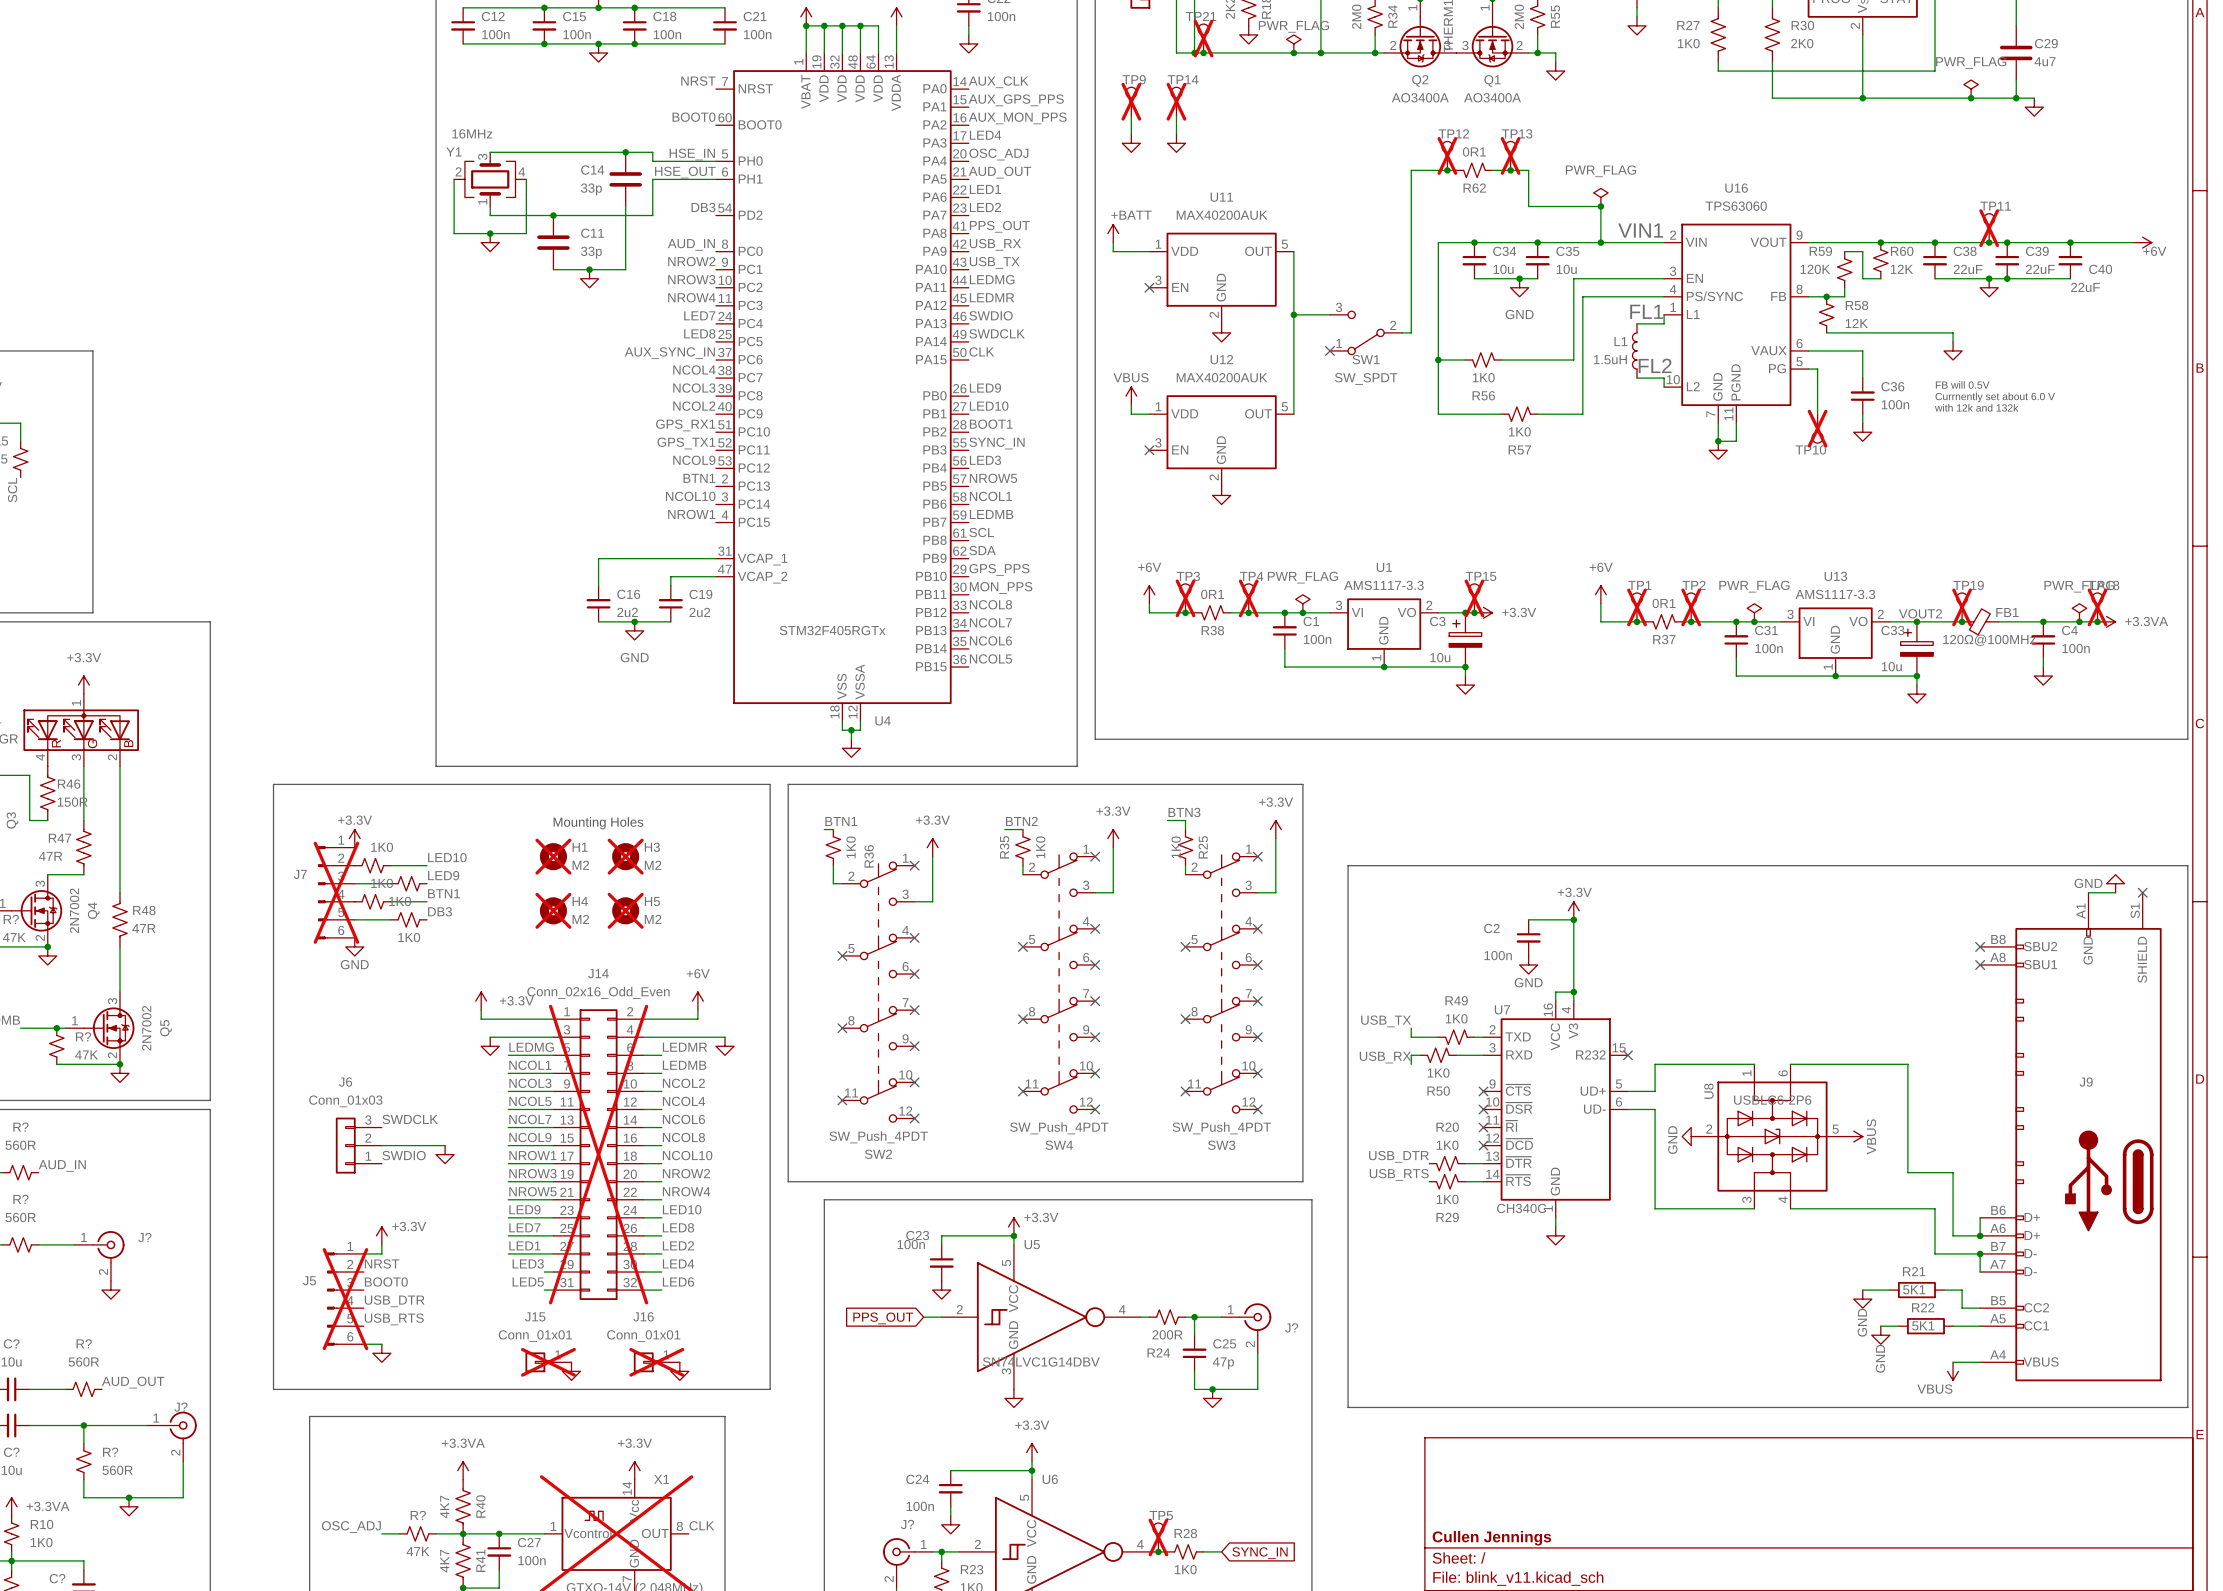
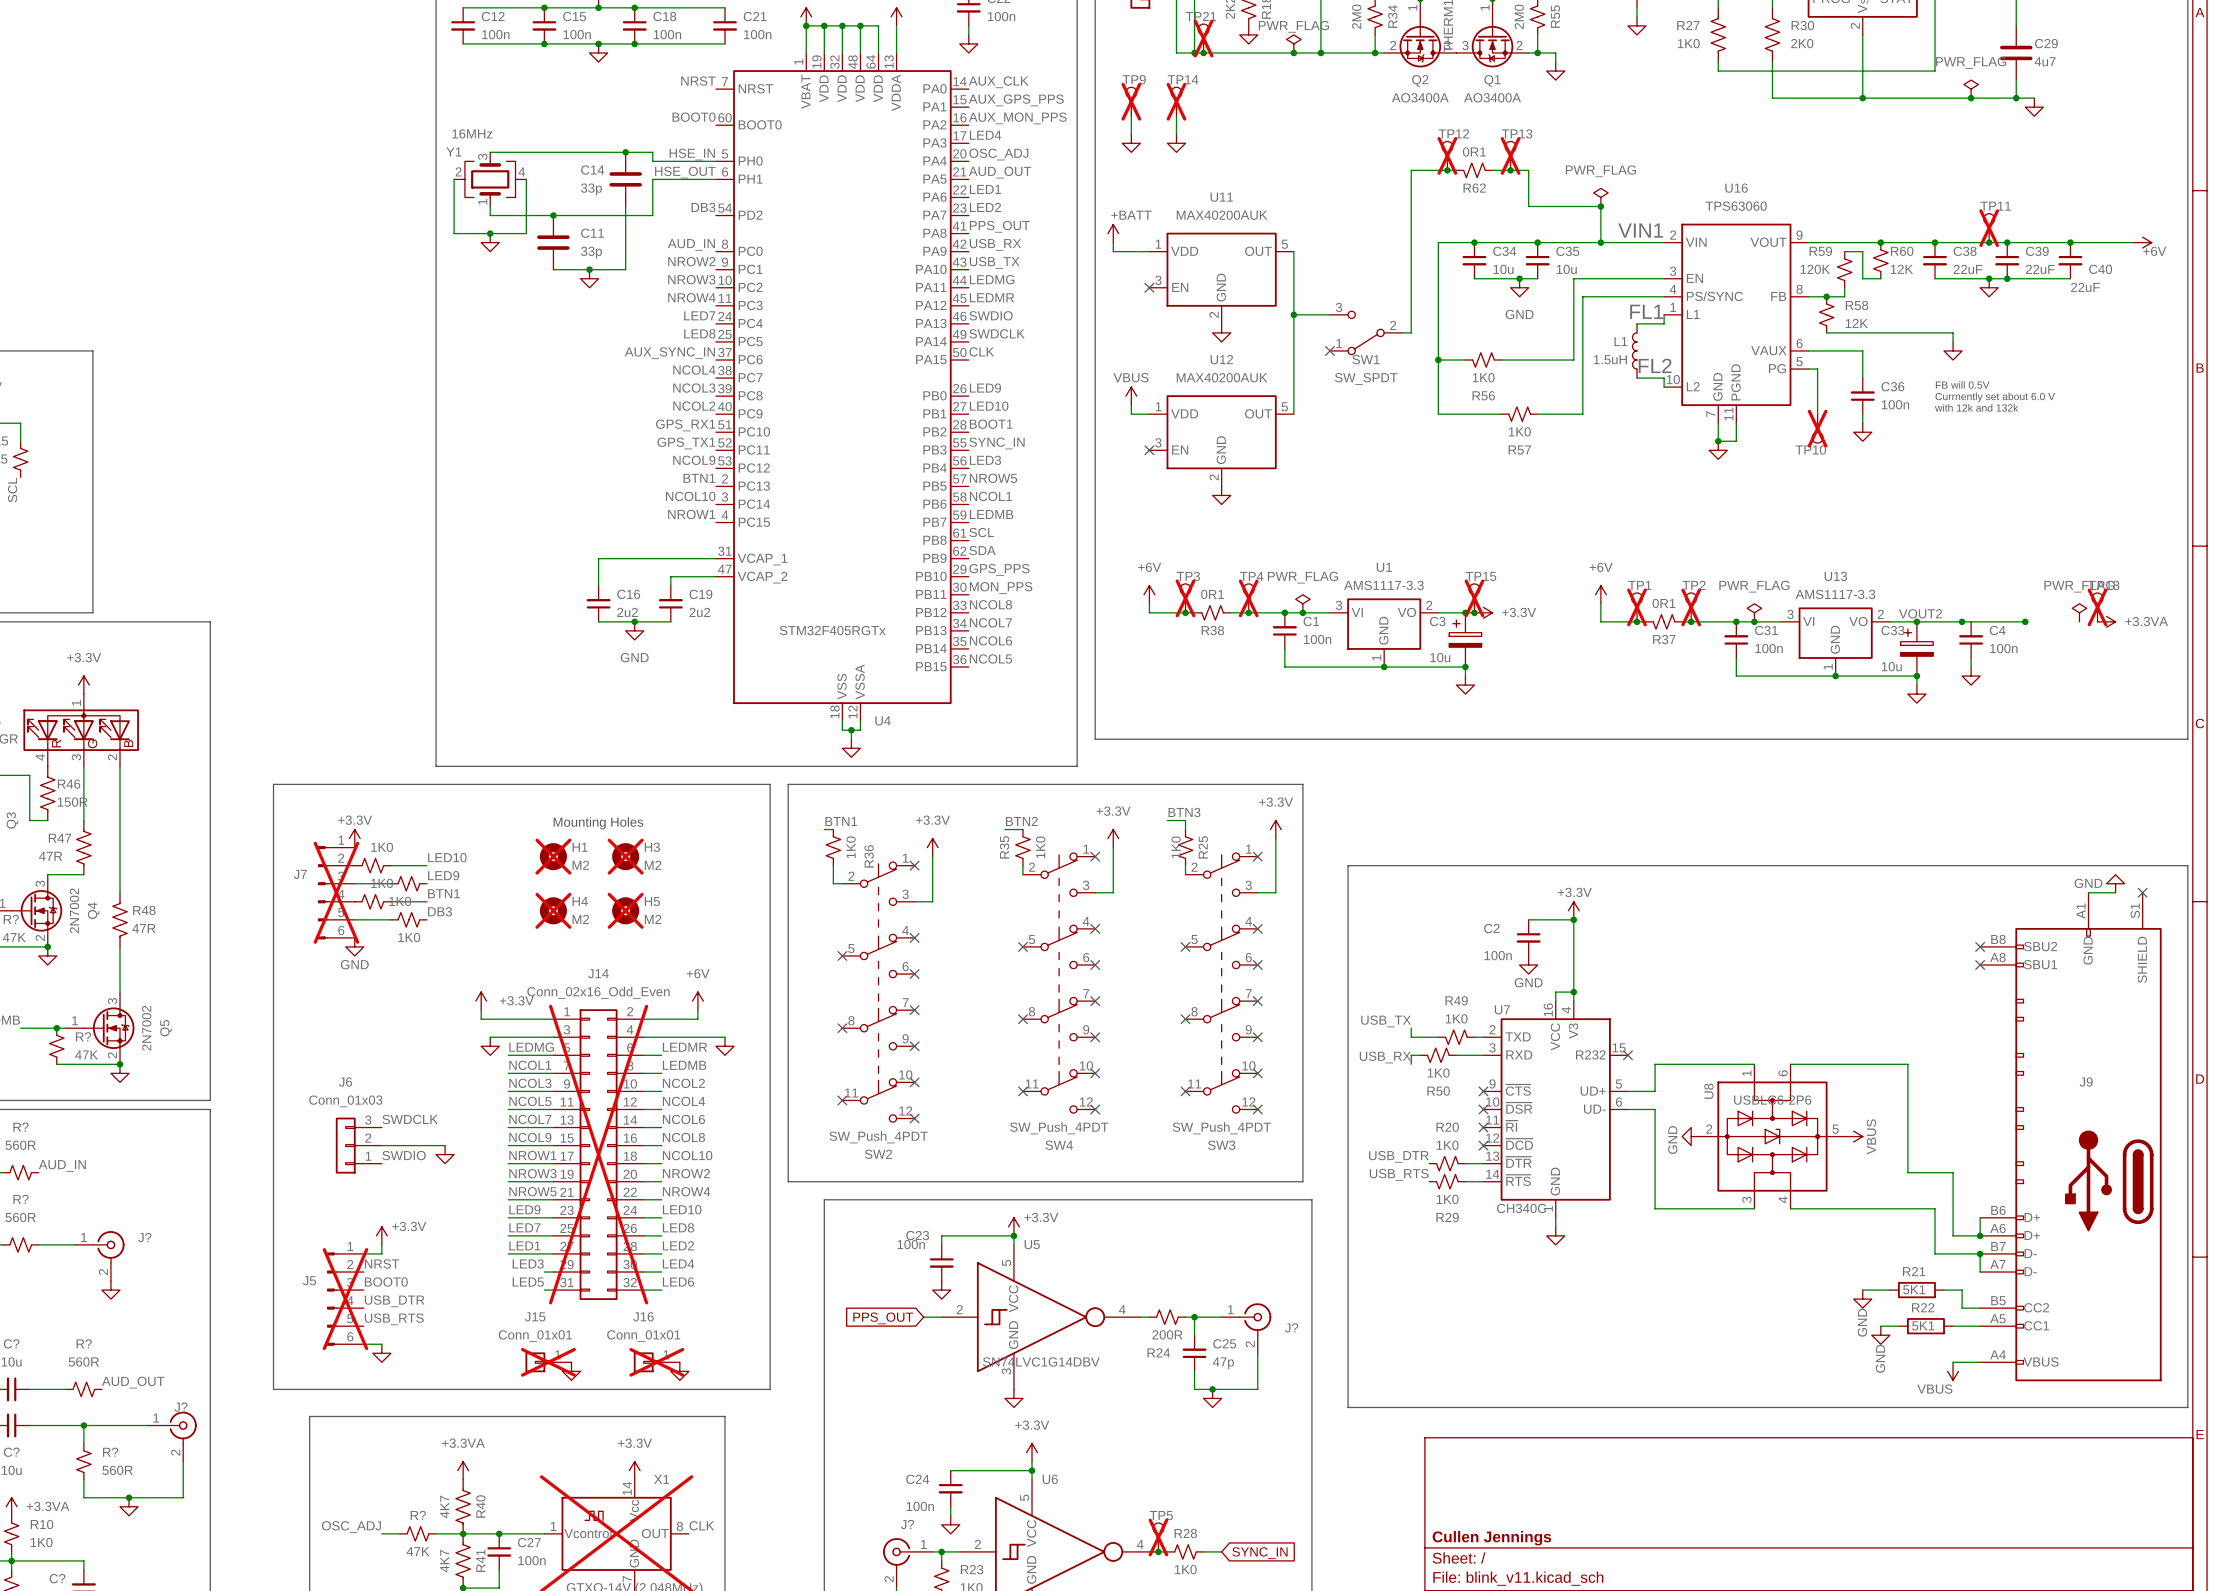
TP19: (1962, 607) -> none
FB1: 120Ω@100MHz (1980, 621) -> none
wire: (2025, 621) (2097, 621) -> none
junction position: (2043, 621) -> (2025, 621)
junction: (2079, 621) -> none
junction: (2097, 621) -> none
C4 position: (2043, 639) -> (1971, 639)
wire: (2043, 657) (2043, 667) -> (1971, 657) (1971, 667)
power symbol position: (2043, 676) -> (1971, 676)

